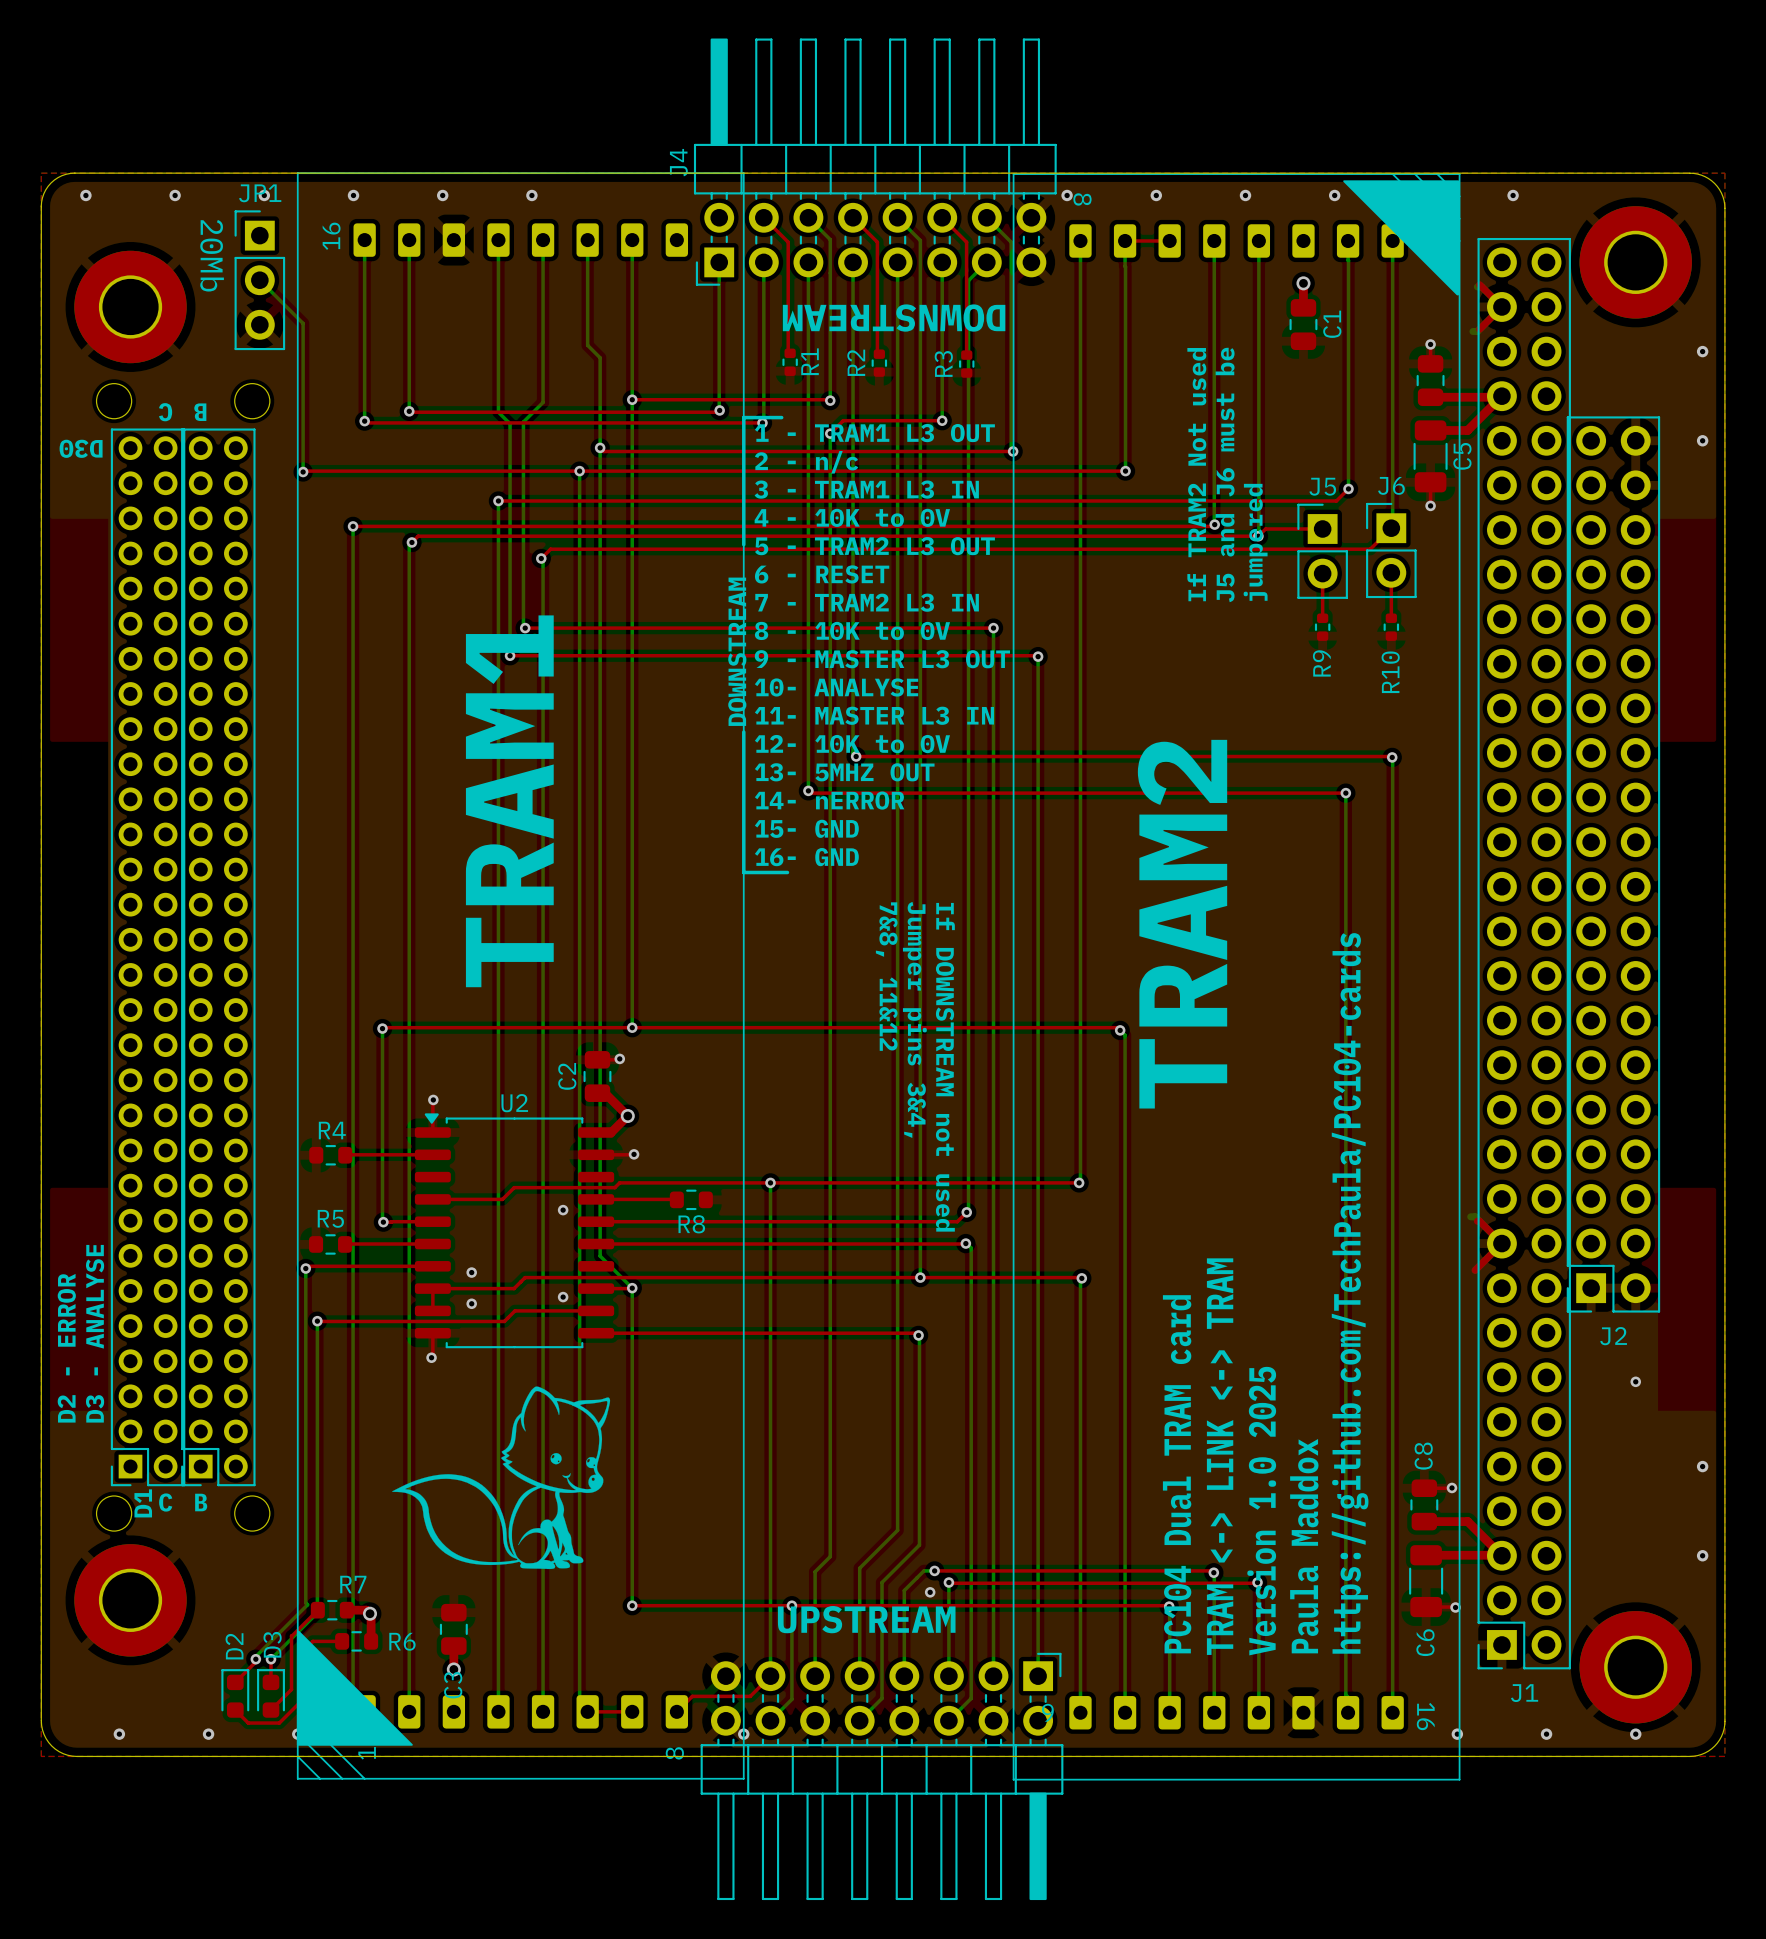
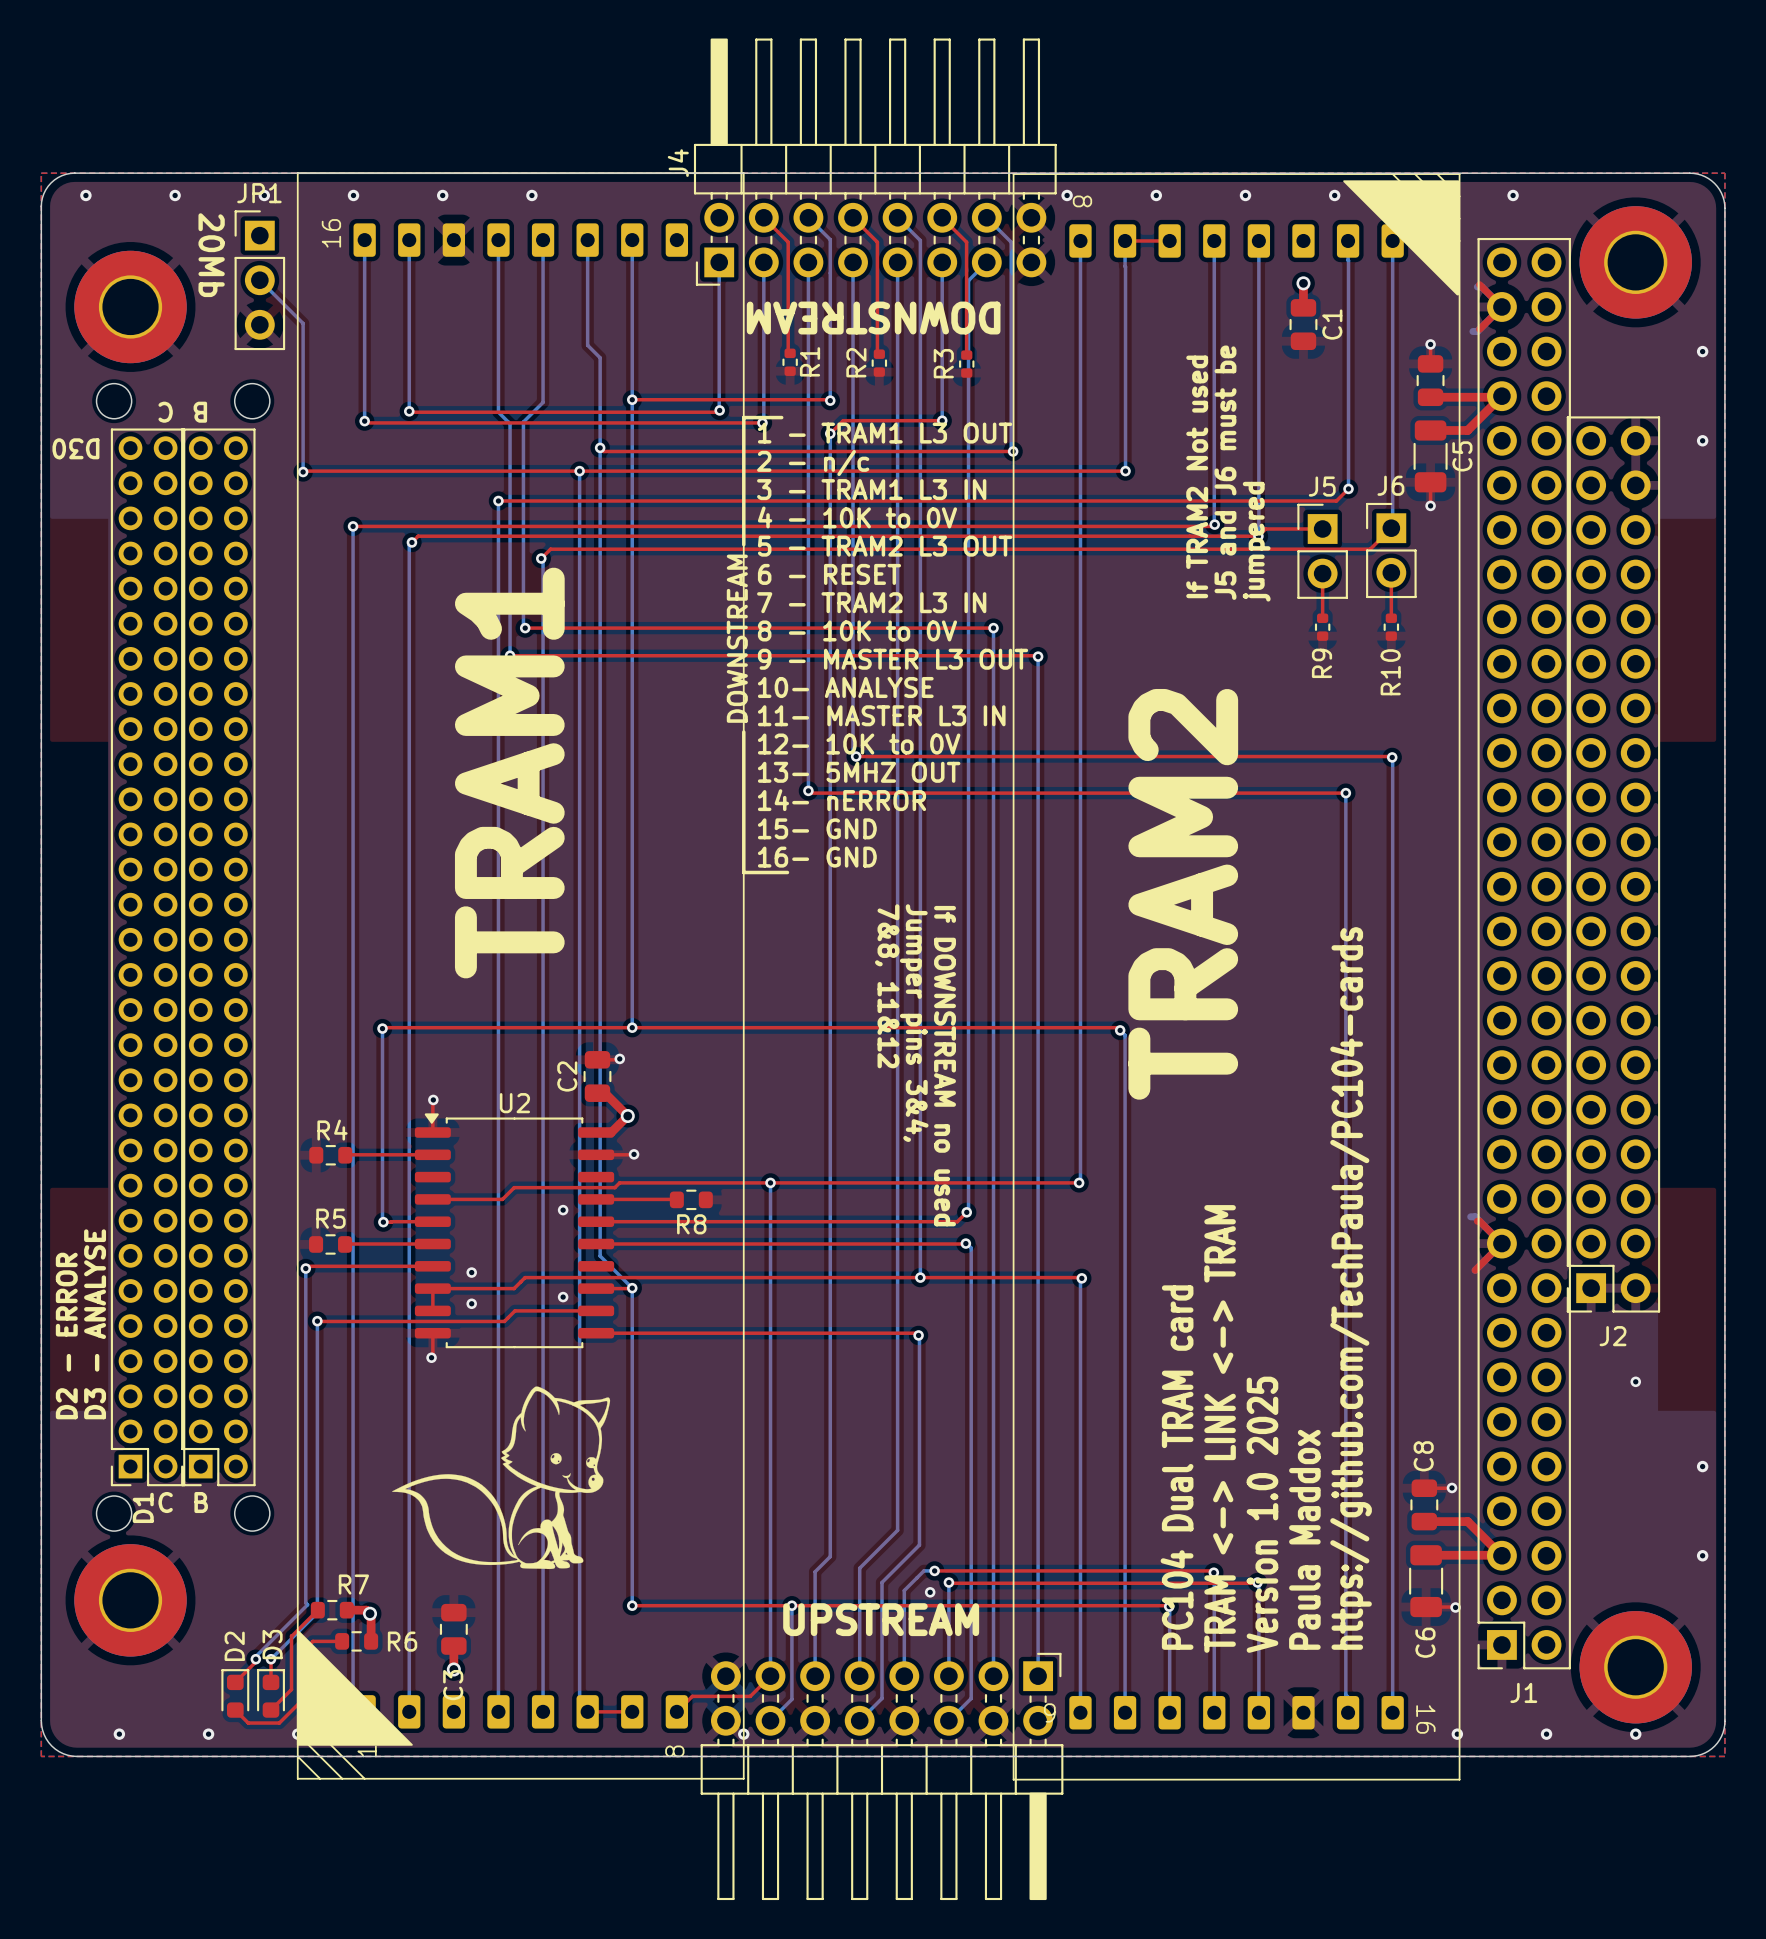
text: If DOWNSTREAM not used (945, 1067) -> If DOWNSTREAM no used (945, 1066)

